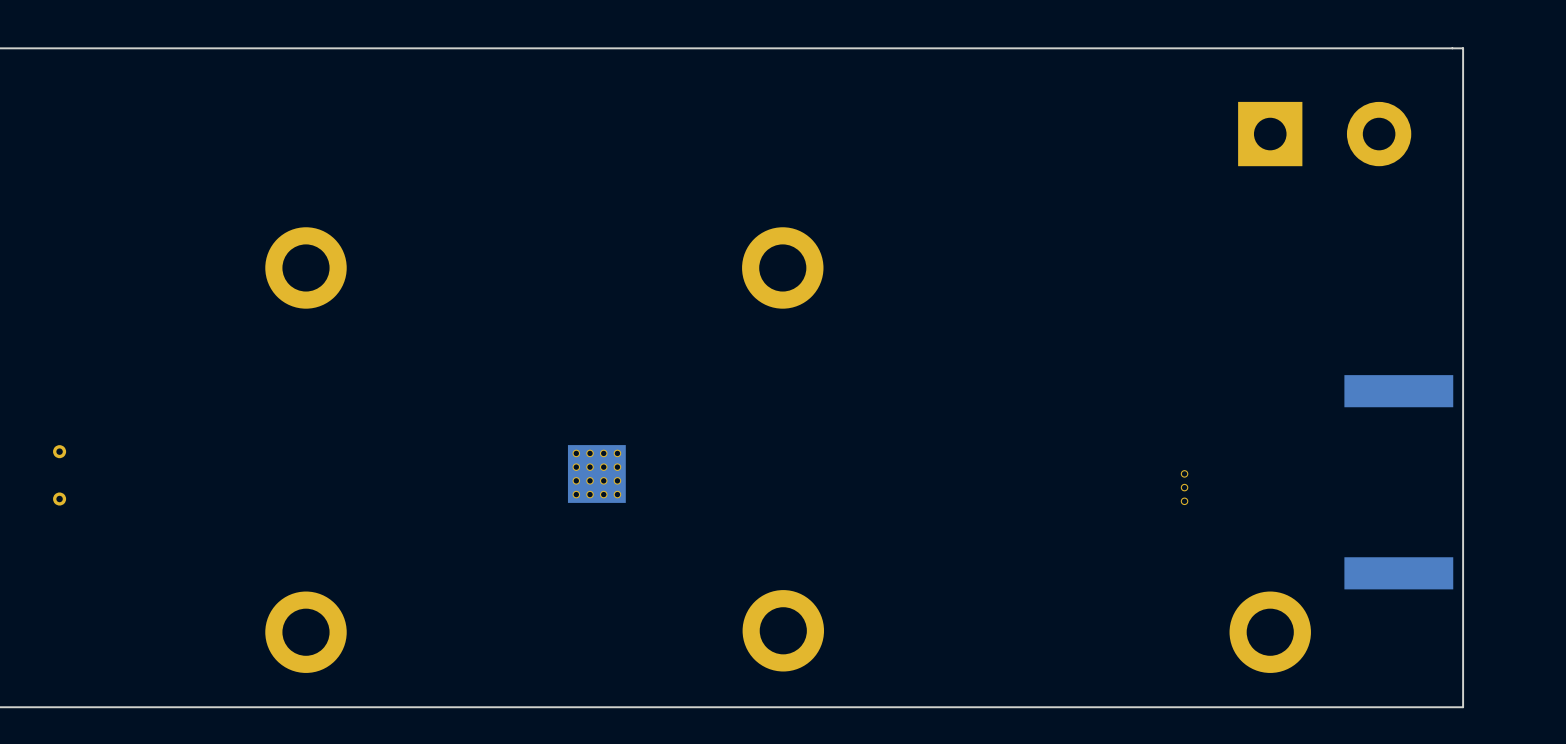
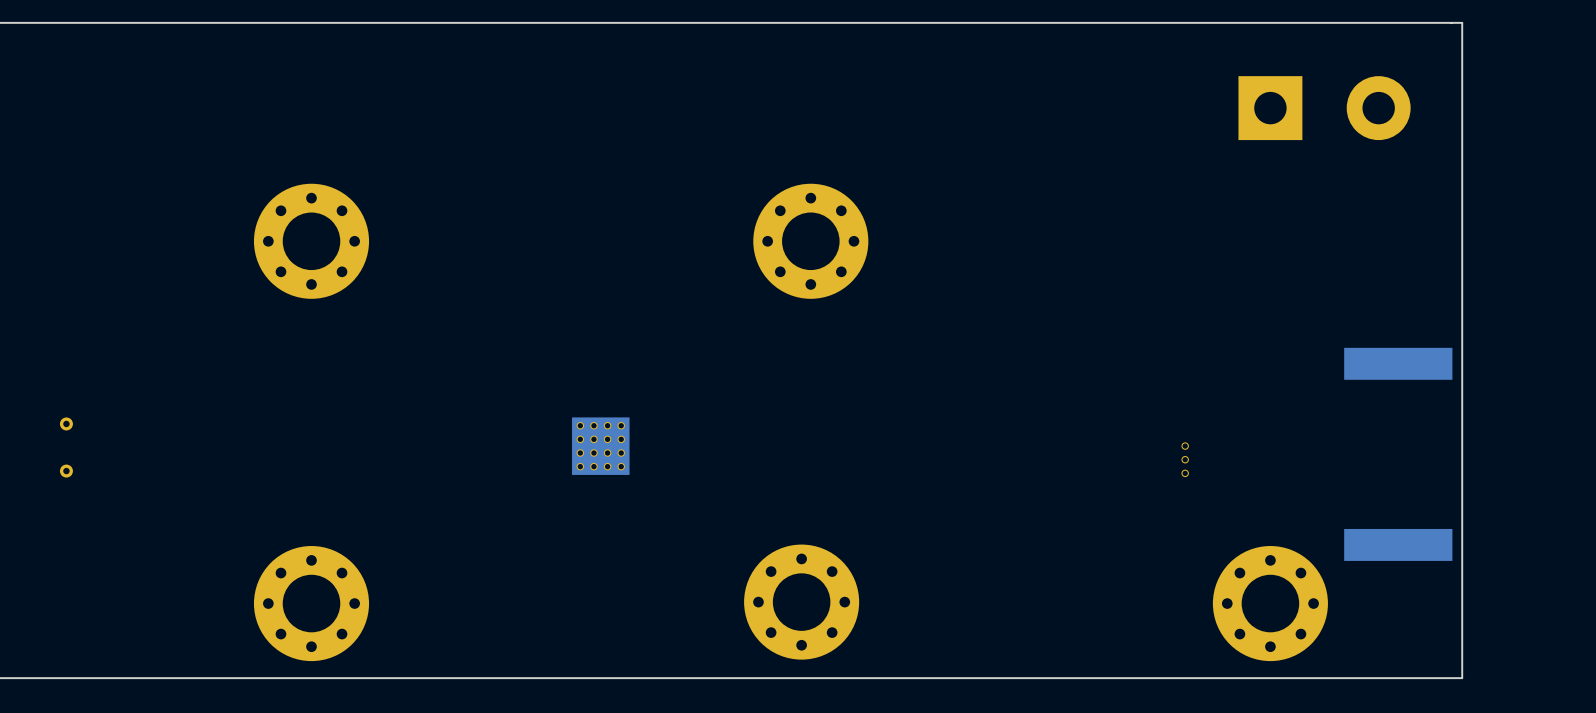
part footprint: [265, 227, 347, 309] -> [253, 183, 370, 299]
part: (782, 267) -> none
part: none -> (810, 241)
part footprint: [742, 590, 825, 672] -> [744, 544, 860, 660]
part footprint: [265, 591, 347, 673] -> [253, 546, 370, 662]
part footprint: [1229, 591, 1311, 673] -> [1212, 546, 1328, 662]

